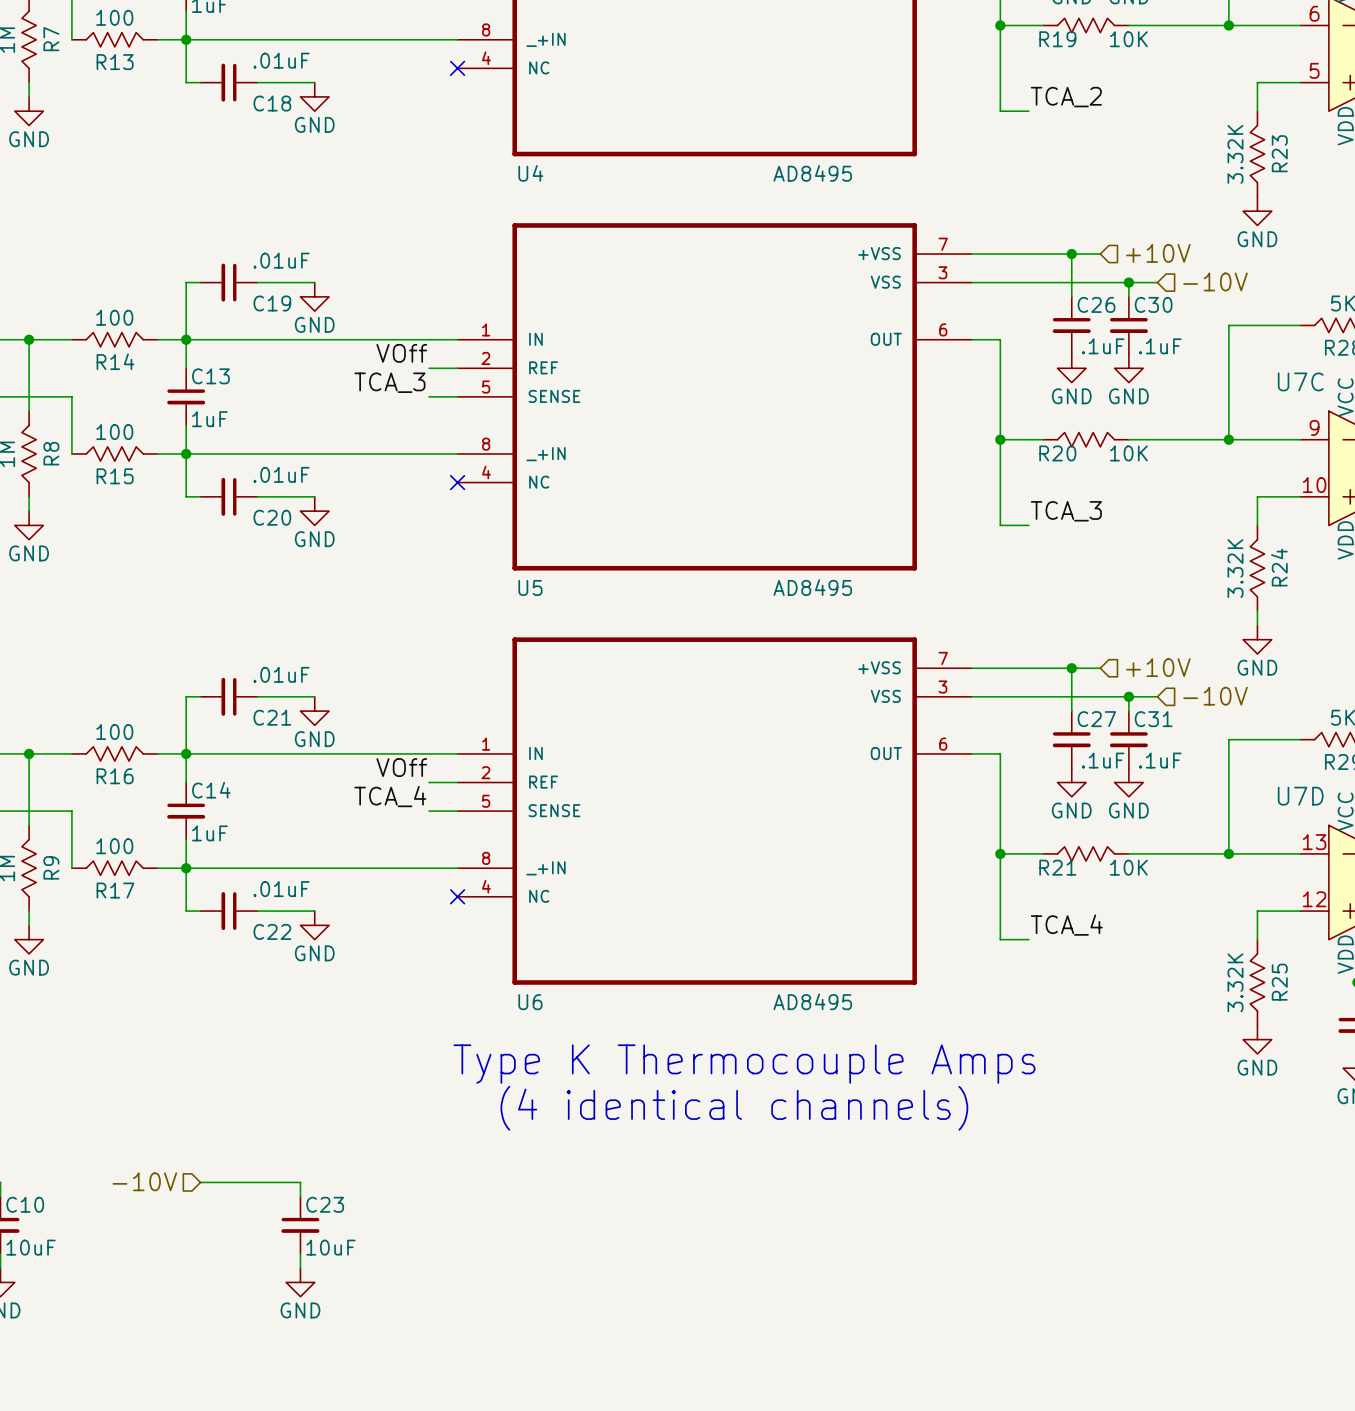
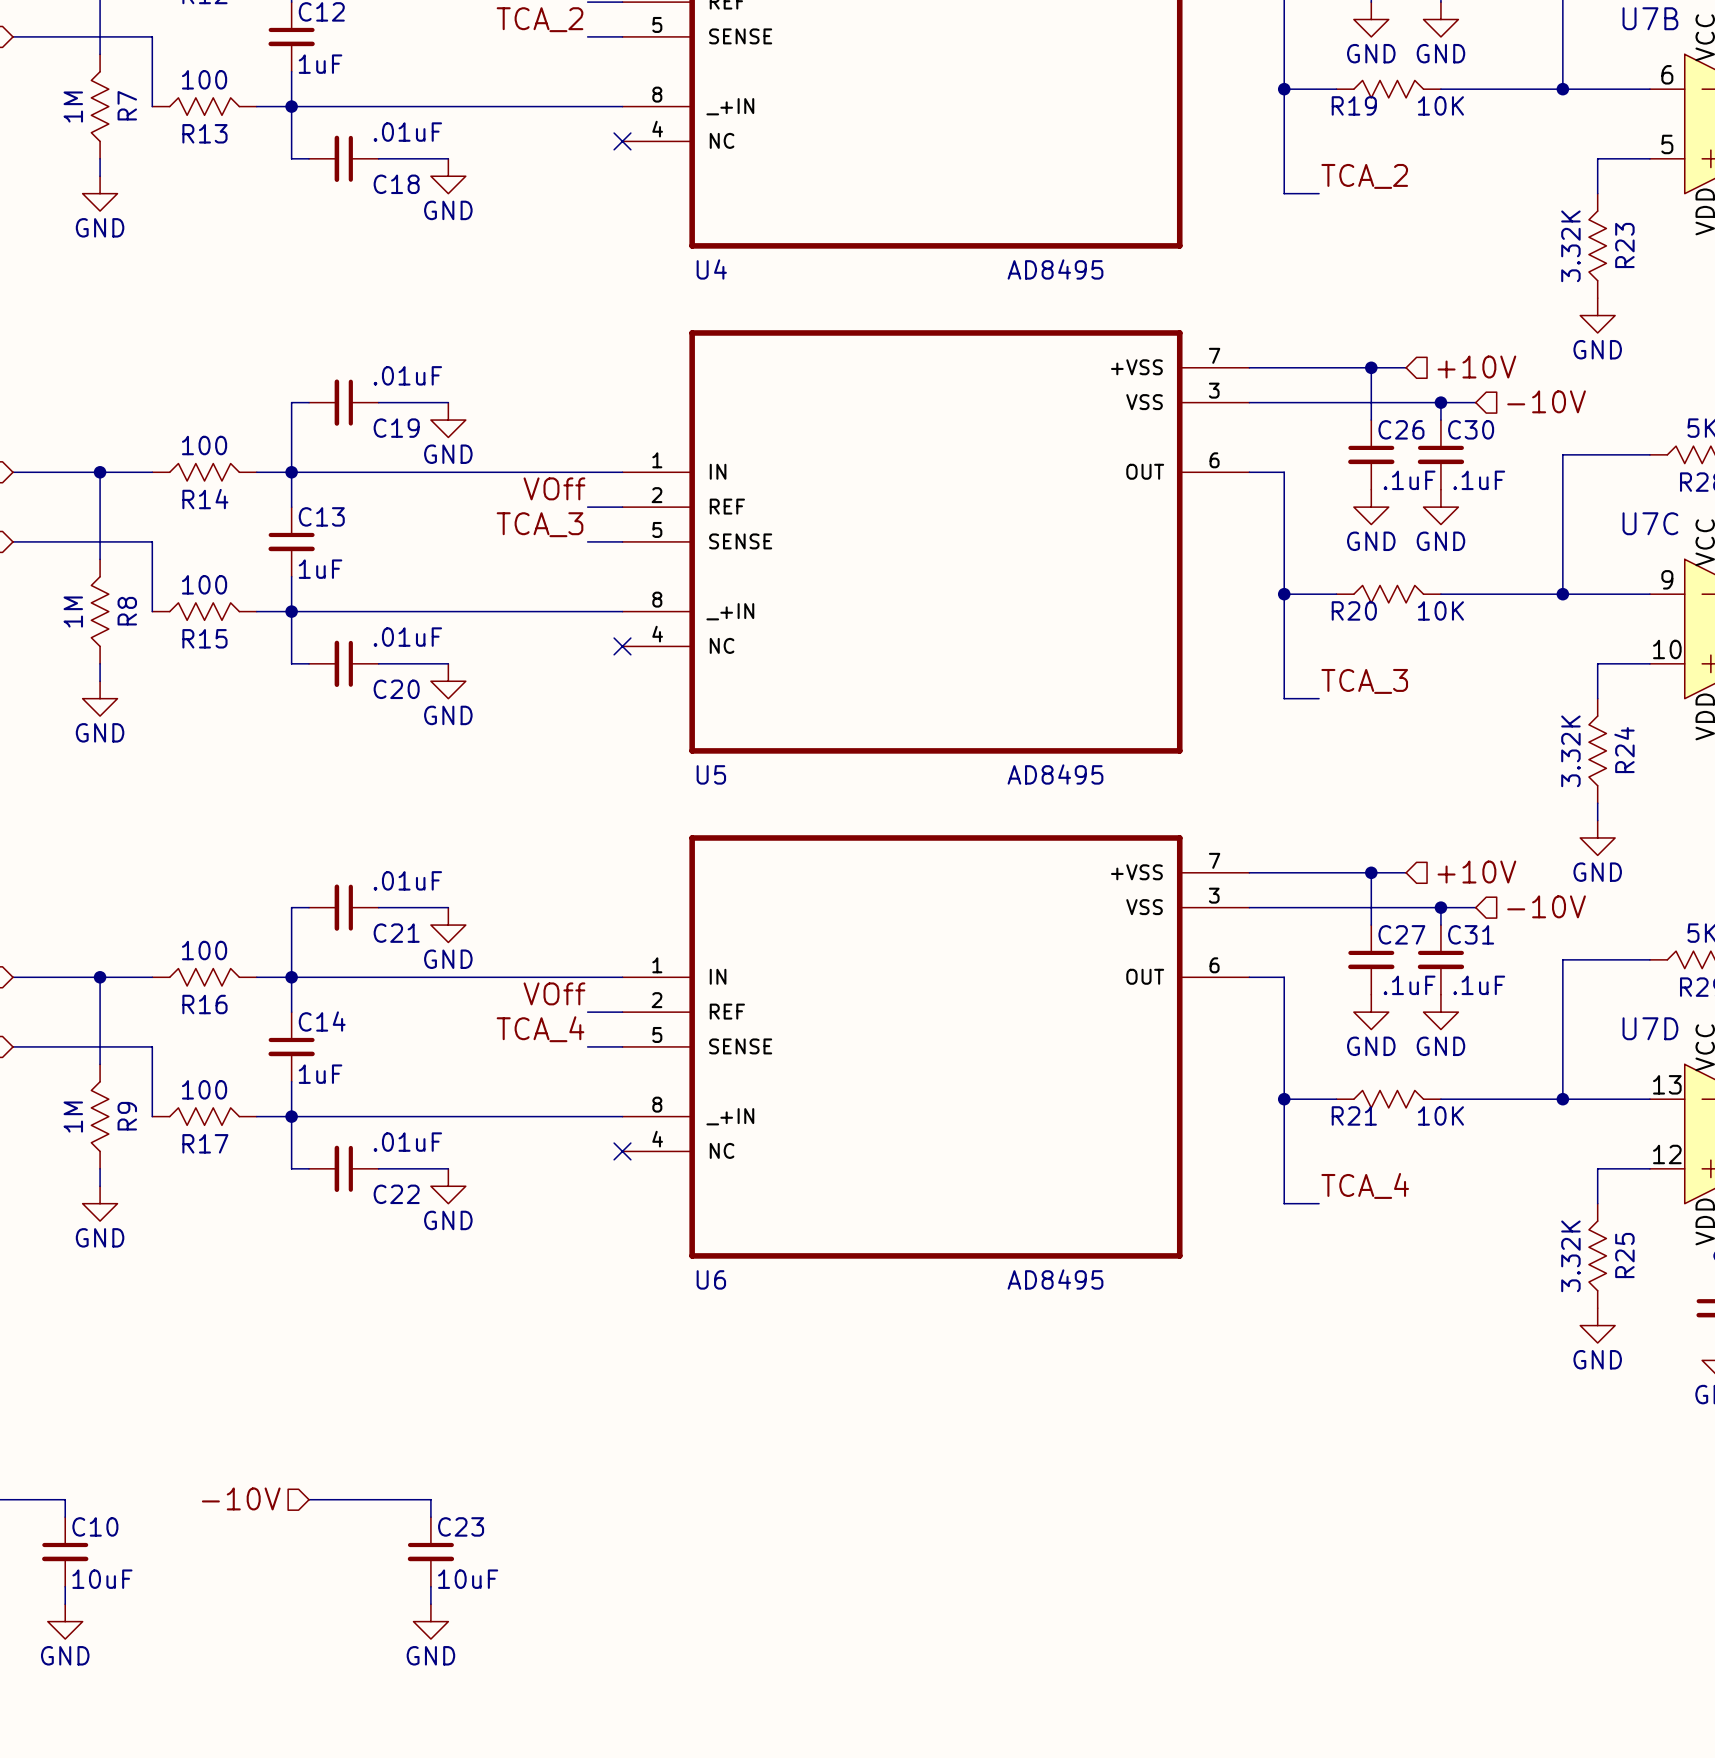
text: Type K Thermocouple Amps (744, 1064) -> none
text: (4 identical channels) (734, 1108) -> none

